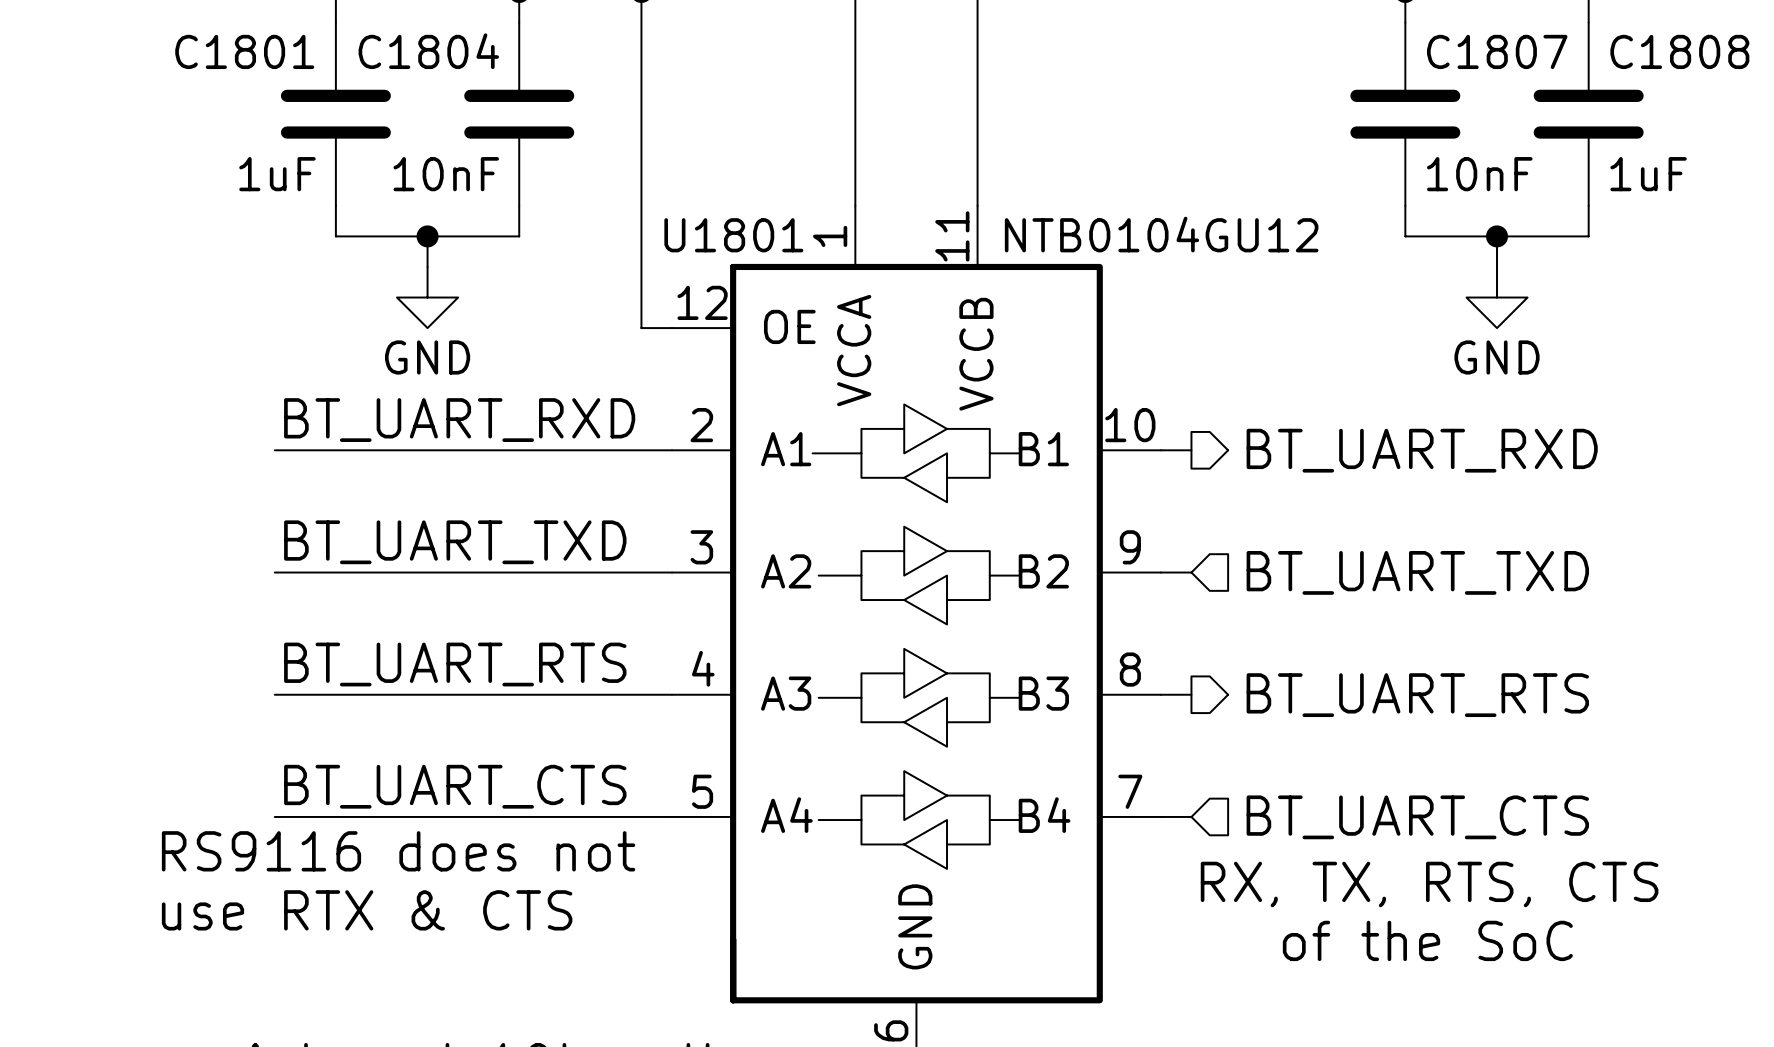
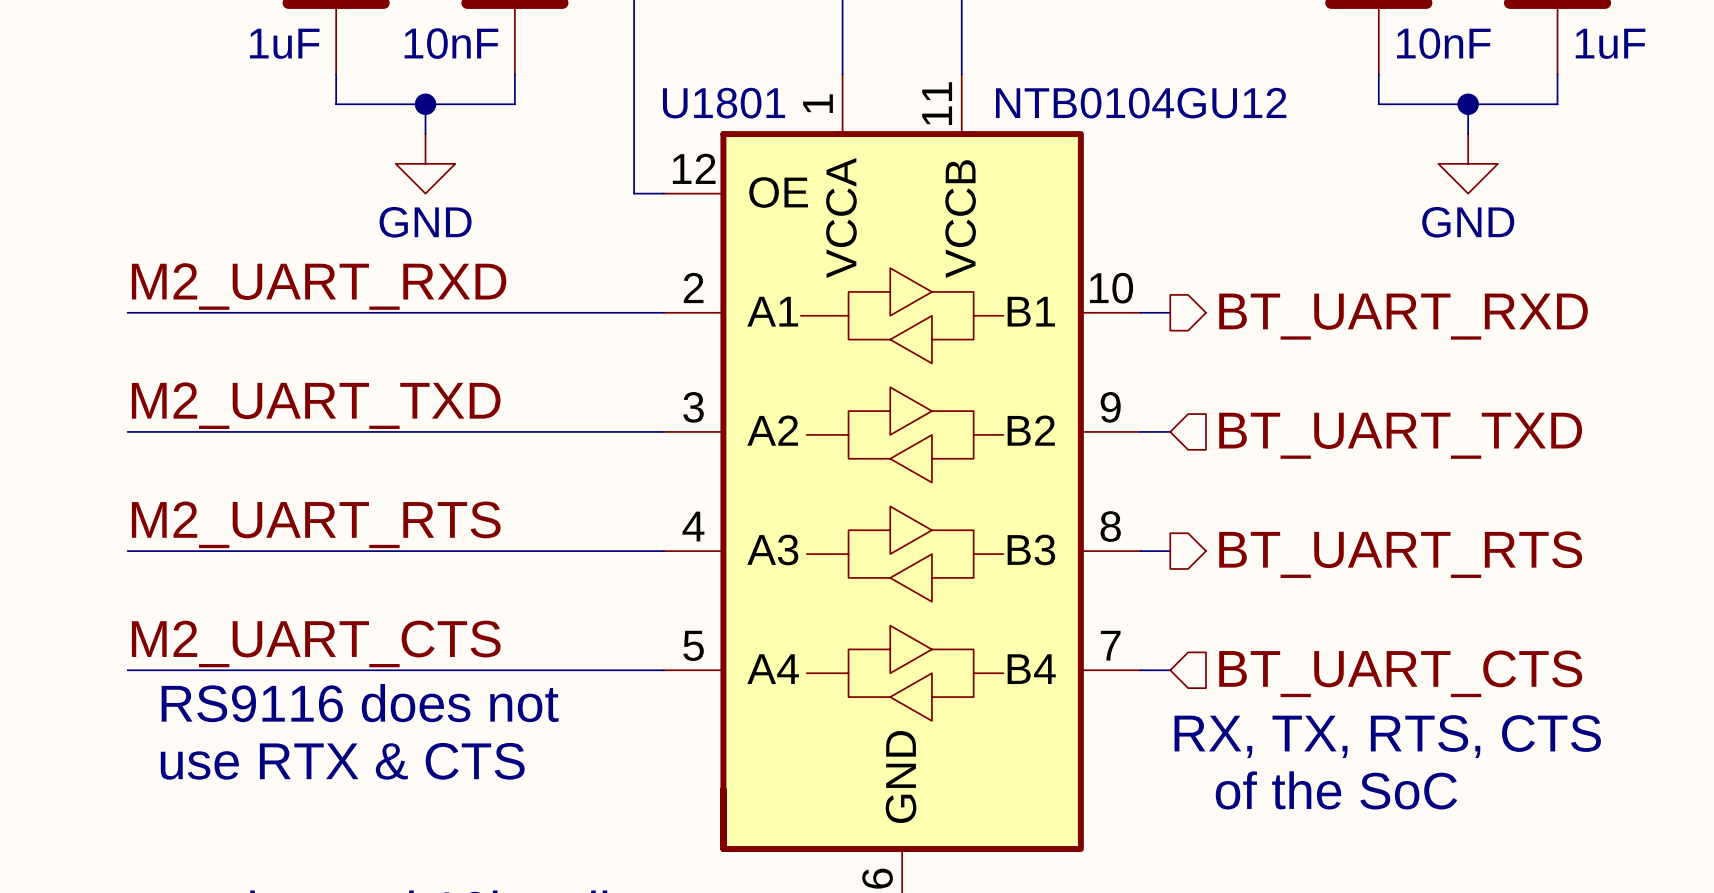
label: BT_UART_RXD (459, 420) -> M2_UART_RXD (319, 286)
wire: none -> (127, 312) (276, 312)
label: BT_UART_TXD (455, 542) -> M2_UART_TXD (316, 405)
wire: none -> (127, 431) (276, 431)
label: BT_UART_RTS (455, 664) -> M2_UART_RTS (316, 524)
wire: none -> (127, 551) (276, 551)
label: BT_UART_CTS (455, 786) -> M2_UART_CTS (316, 643)
wire: none -> (127, 670) (276, 670)

